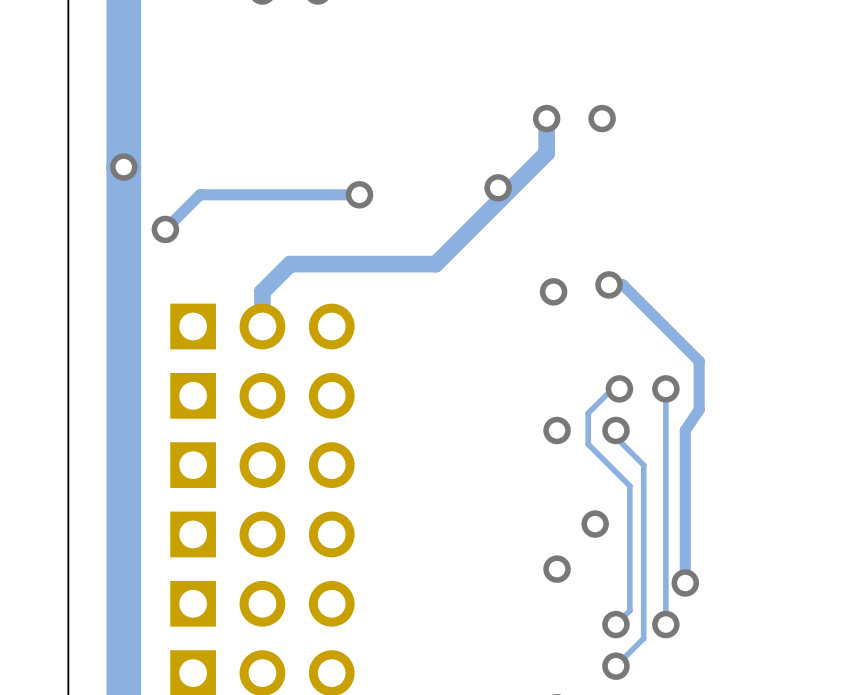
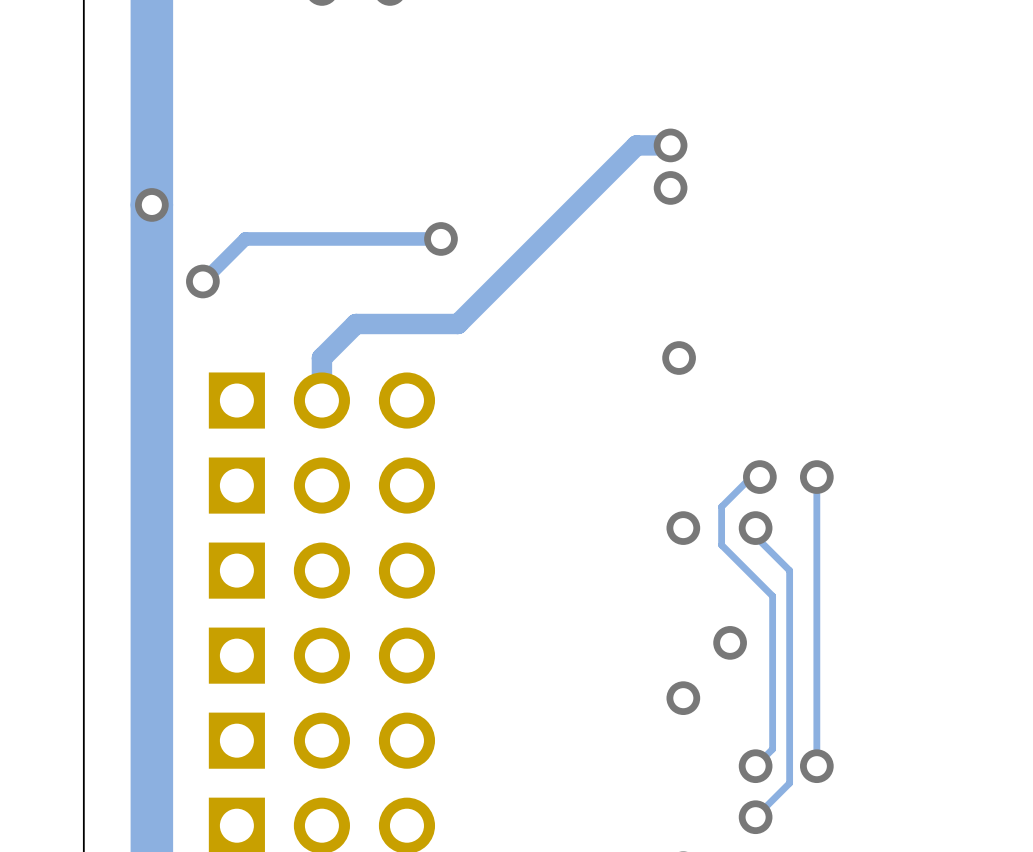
track: (546, 118) (546, 153) (435, 264) (373, 264) -> (670, 145) (636, 145) (457, 324)
via: (602, 118) -> none
via: none -> (670, 187)
via: (498, 187) -> none
track: (609, 284) (622, 284) (699, 361) (699, 409) (685, 430) (685, 582) -> none
via: (609, 284) -> none
via: (685, 582) -> none

